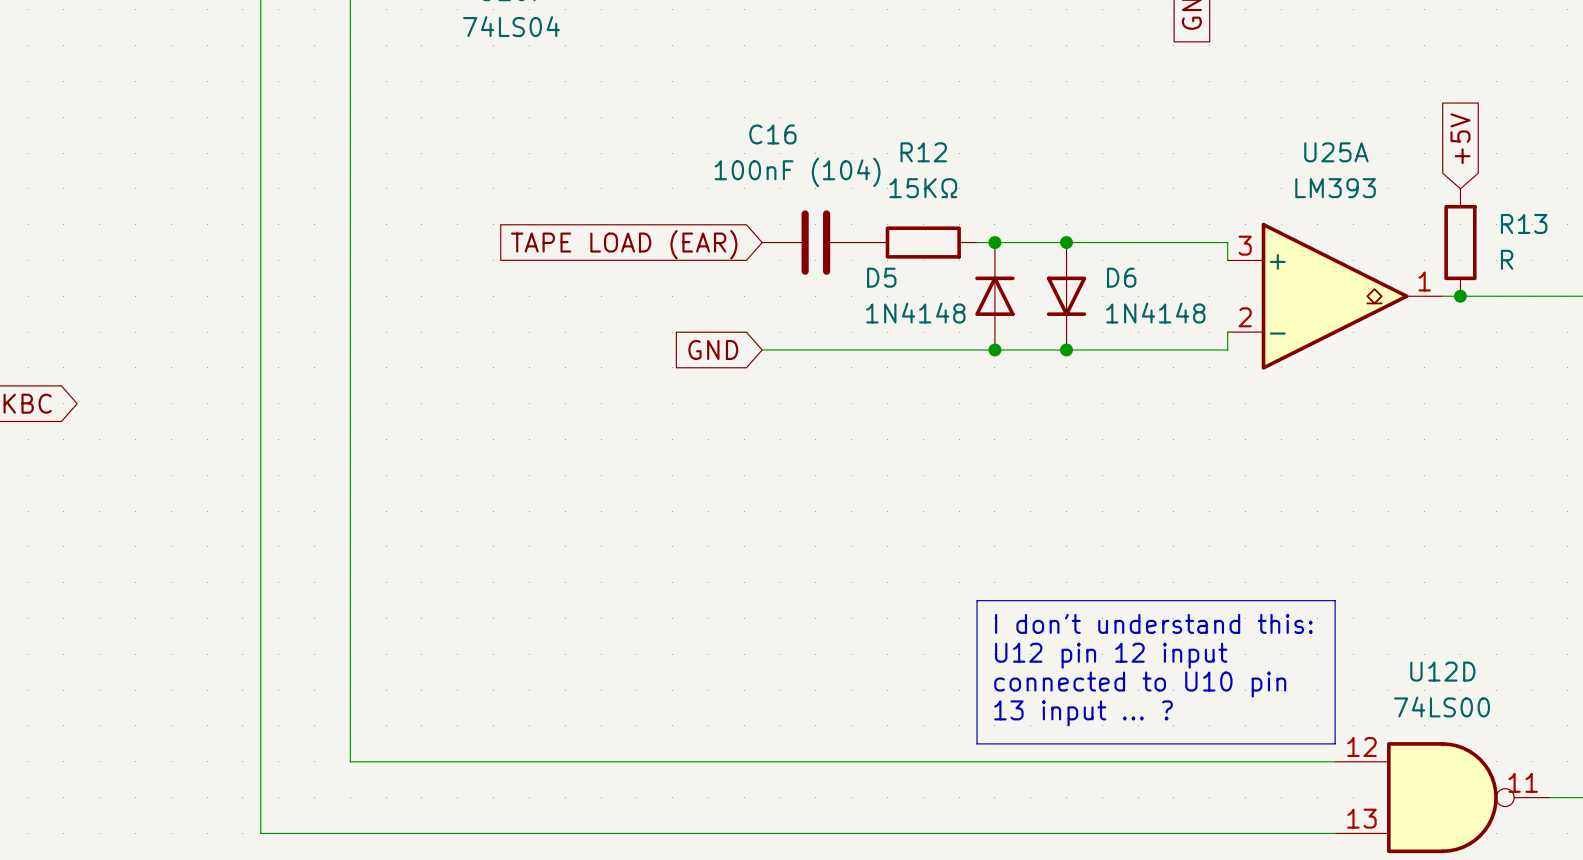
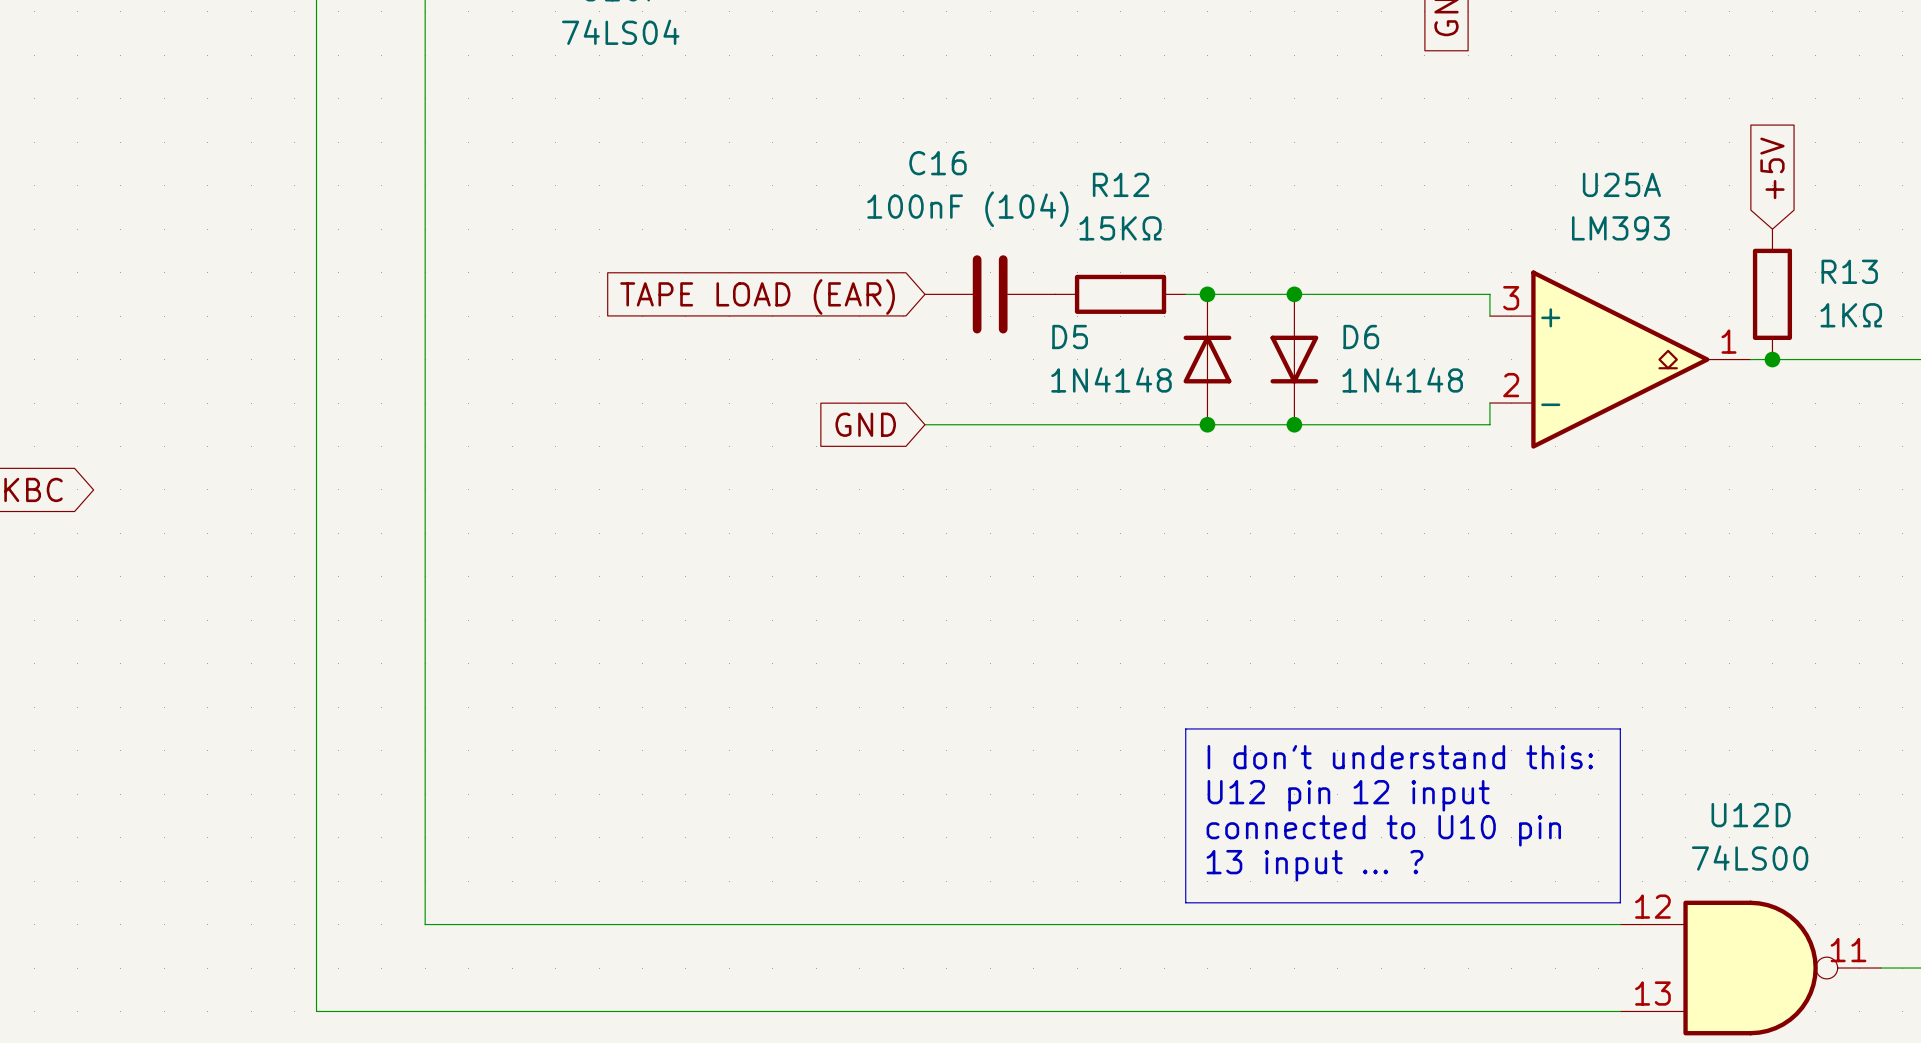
R13 value: R (1507, 259) -> 1KΩ (1851, 315)

